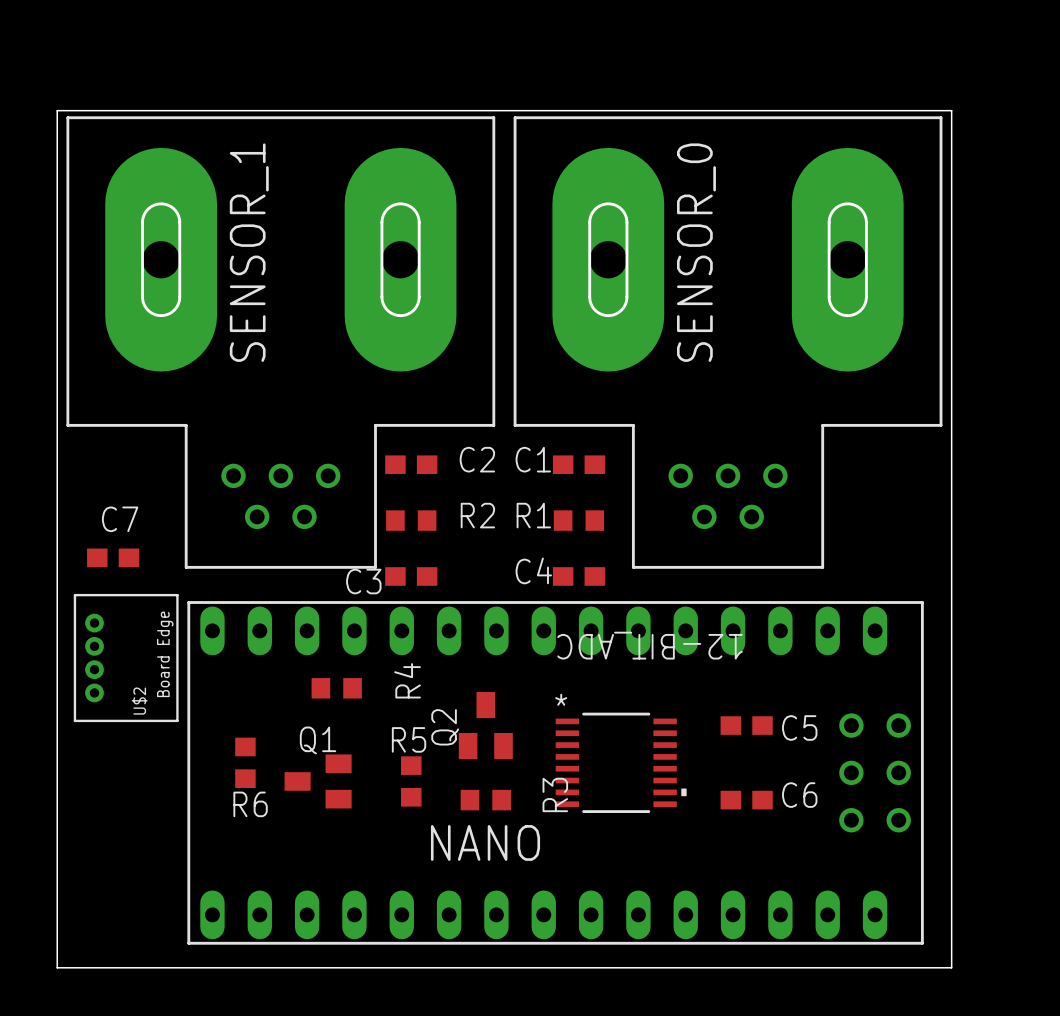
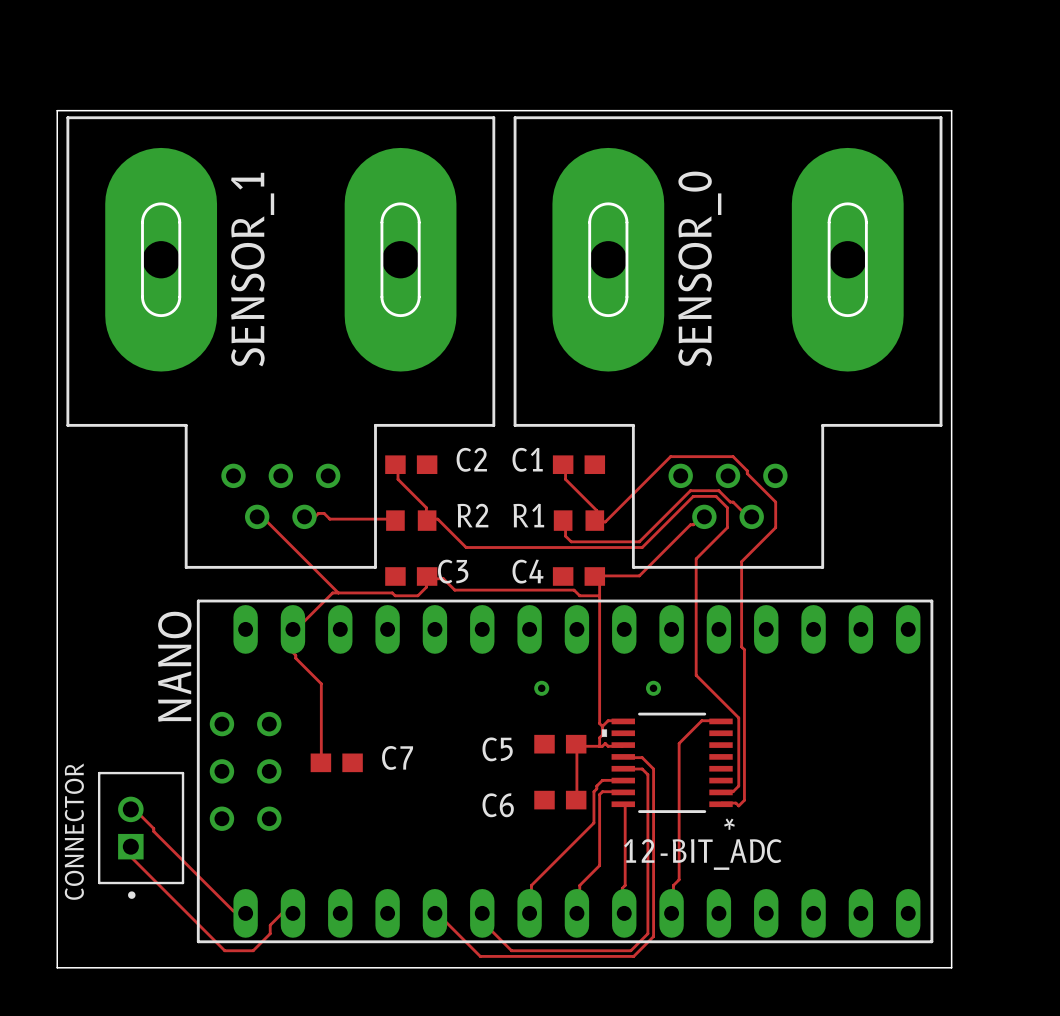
top track: none -> (395, 464) (398, 465) (398, 479) (426, 507) (427, 520) (437, 519) (466, 547) (642, 547) (693, 496) (716, 496) (727, 507) (727, 527) (696, 558) (696, 675) (738, 717) (738, 786) (733, 791) (721, 792)
top track: none -> (563, 464) (565, 465) (565, 479) (596, 510) (596, 519) (594, 520) (596, 521) (605, 521) (670, 456) (733, 456) (775, 502) (775, 527) (741, 561) (741, 646) (744, 649) (744, 800) (738, 805) (735, 803) (721, 804)
top track: none -> (257, 516) (258, 519) (264, 519) (338, 592)
top track: none -> (304, 516) (324, 513) (329, 519) (395, 520)
top track: none -> (704, 516) (701, 516) (693, 524) (690, 524) (639, 575) (596, 575) (594, 576) (599, 575) (599, 723) (602, 726)
top track: none -> (751, 516) (750, 519) (718, 490) (690, 490) (639, 541) (571, 541) (565, 536) (565, 521) (563, 520)
C7 name position: C7 (120, 519) -> C7 (397, 757)
C7 position: (113, 557) -> (336, 762)
C3 name position: C3 (363, 581) -> C3 (453, 571)
top track: none -> (599, 595) (579, 595) (574, 590) (454, 590) (443, 578) (429, 578) (427, 576) (426, 587) (417, 595) (395, 595) (392, 592) (332, 592) (295, 629) (292, 629) (292, 652) (295, 658) (321, 683) (320, 762)
12-BIT_ADC name position: 12-BIT_ADC (650, 645) -> 12-BIT_ADC (702, 854)
U$2: (126, 658) -> none
R4: (336, 688) -> none
via: none -> (541, 688)
via: none -> (653, 688)
top track: none -> (623, 721) (608, 720) (602, 726)
top track: none -> (721, 721) (701, 720) (679, 743) (679, 879) (673, 885) (673, 911) (671, 913)
Q2: (485, 725) -> none
C5 position: (746, 725) -> (560, 744)
top track: none -> (602, 726) (599, 746)
C5 name position: C5 (799, 727) -> C5 (497, 749)
top track: none -> (623, 745) (608, 746) (605, 743) (602, 746) (576, 746)
top track: none -> (576, 746) (576, 800)
top track: none -> (623, 756) (642, 757) (653, 769) (653, 936) (633, 956) (480, 956) (437, 913) (434, 913)
R6: (245, 762) -> none
12-BIT_ADC rotation: 0° (621, 762) -> 180° (667, 762)
top track: none -> (623, 768) (642, 769) (647, 774) (647, 933) (630, 950) (511, 950) (483, 922) (482, 913)
part rotation: 0° (555, 772) -> 180° (565, 771)
top track: none -> (623, 780) (602, 780) (596, 786) (593, 791) (593, 822) (531, 885) (531, 911) (529, 913)
Q1: (318, 781) -> none
R5: (411, 781) -> none
top track: none -> (623, 792) (602, 791) (599, 794) (599, 865) (579, 885) (579, 911) (576, 913)
C6 name position: C6 (799, 795) -> C6 (498, 805)
R3: (485, 800) -> none
C6 position: (746, 800) -> (560, 800)
top track: none -> (623, 804) (625, 805) (625, 885) (622, 888) (622, 911) (624, 913)
top track: none -> (130, 809) (131, 811) (136, 811) (153, 828) (153, 831) (233, 911) (244, 911) (245, 913)
CONNECTOR: none -> (141, 835)
part value position: NANO (485, 842) -> NANO (174, 666)
top track: none -> (130, 846) (131, 857) (224, 950) (253, 950) (270, 933) (270, 925) (281, 913) (292, 913)

